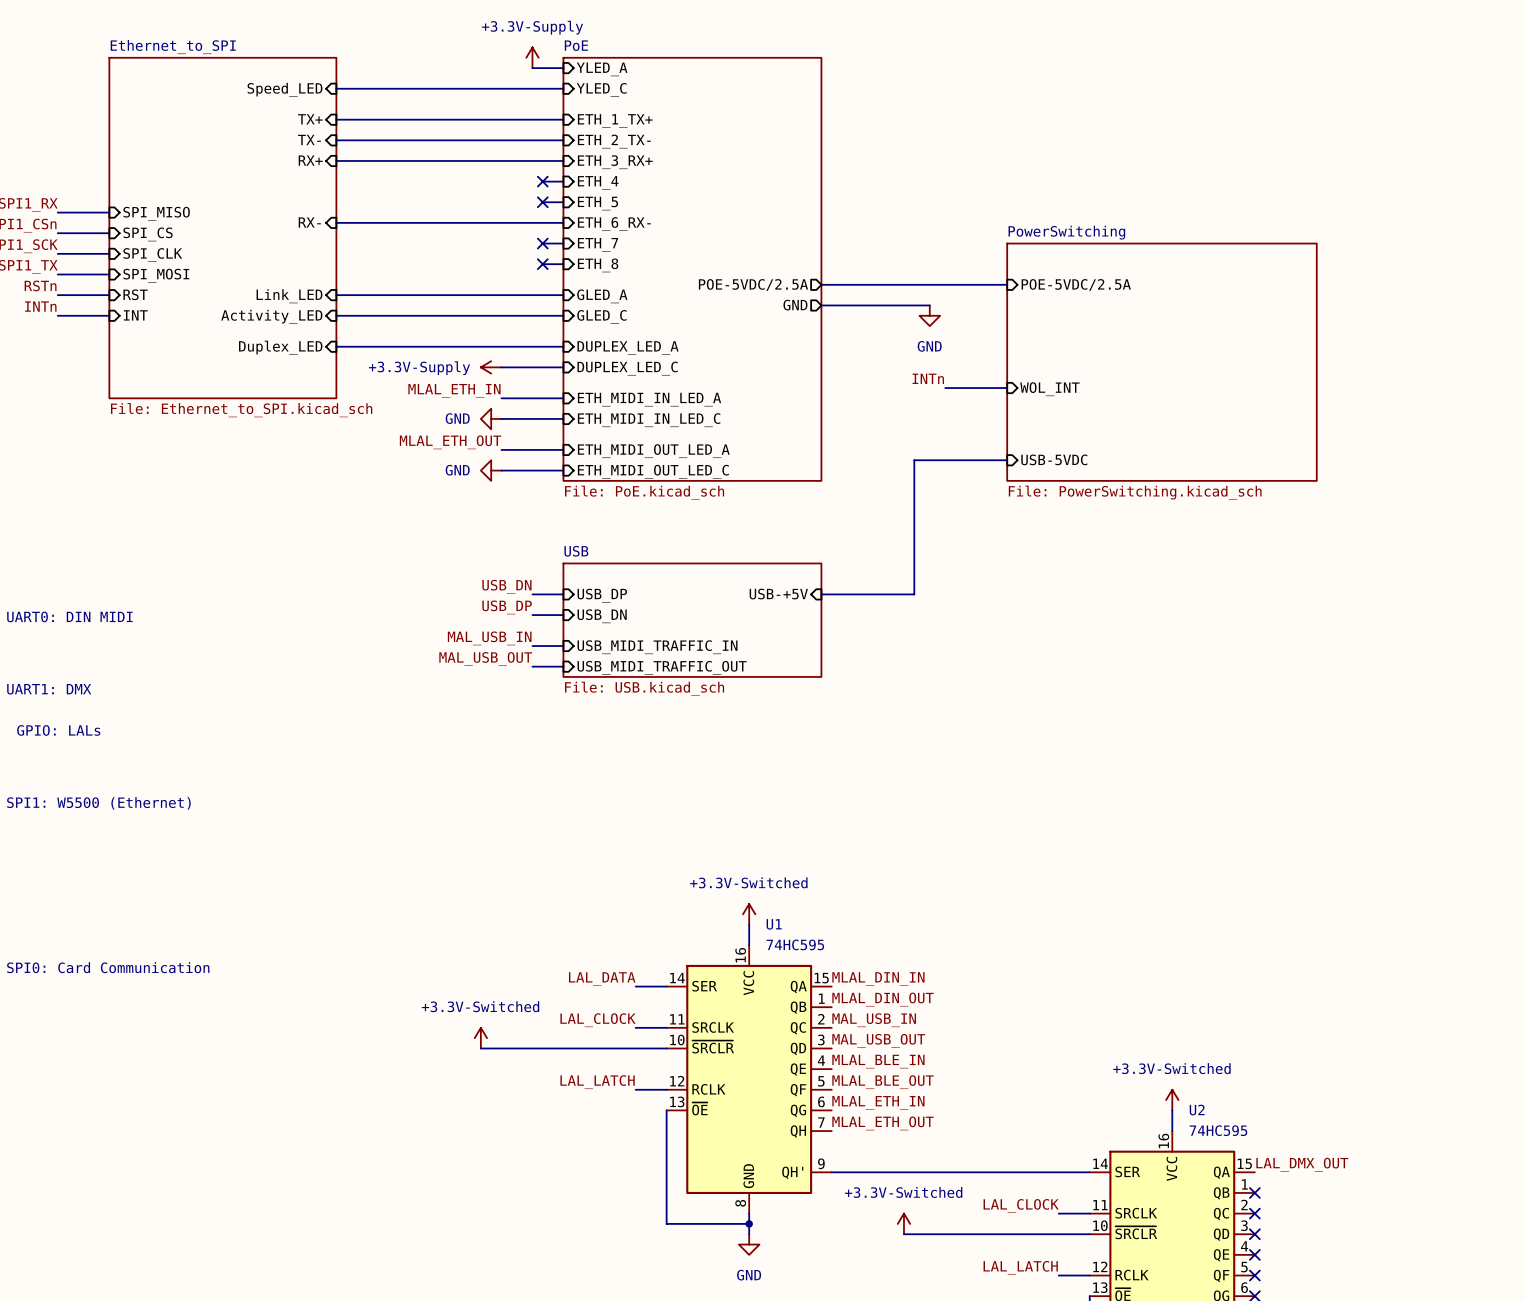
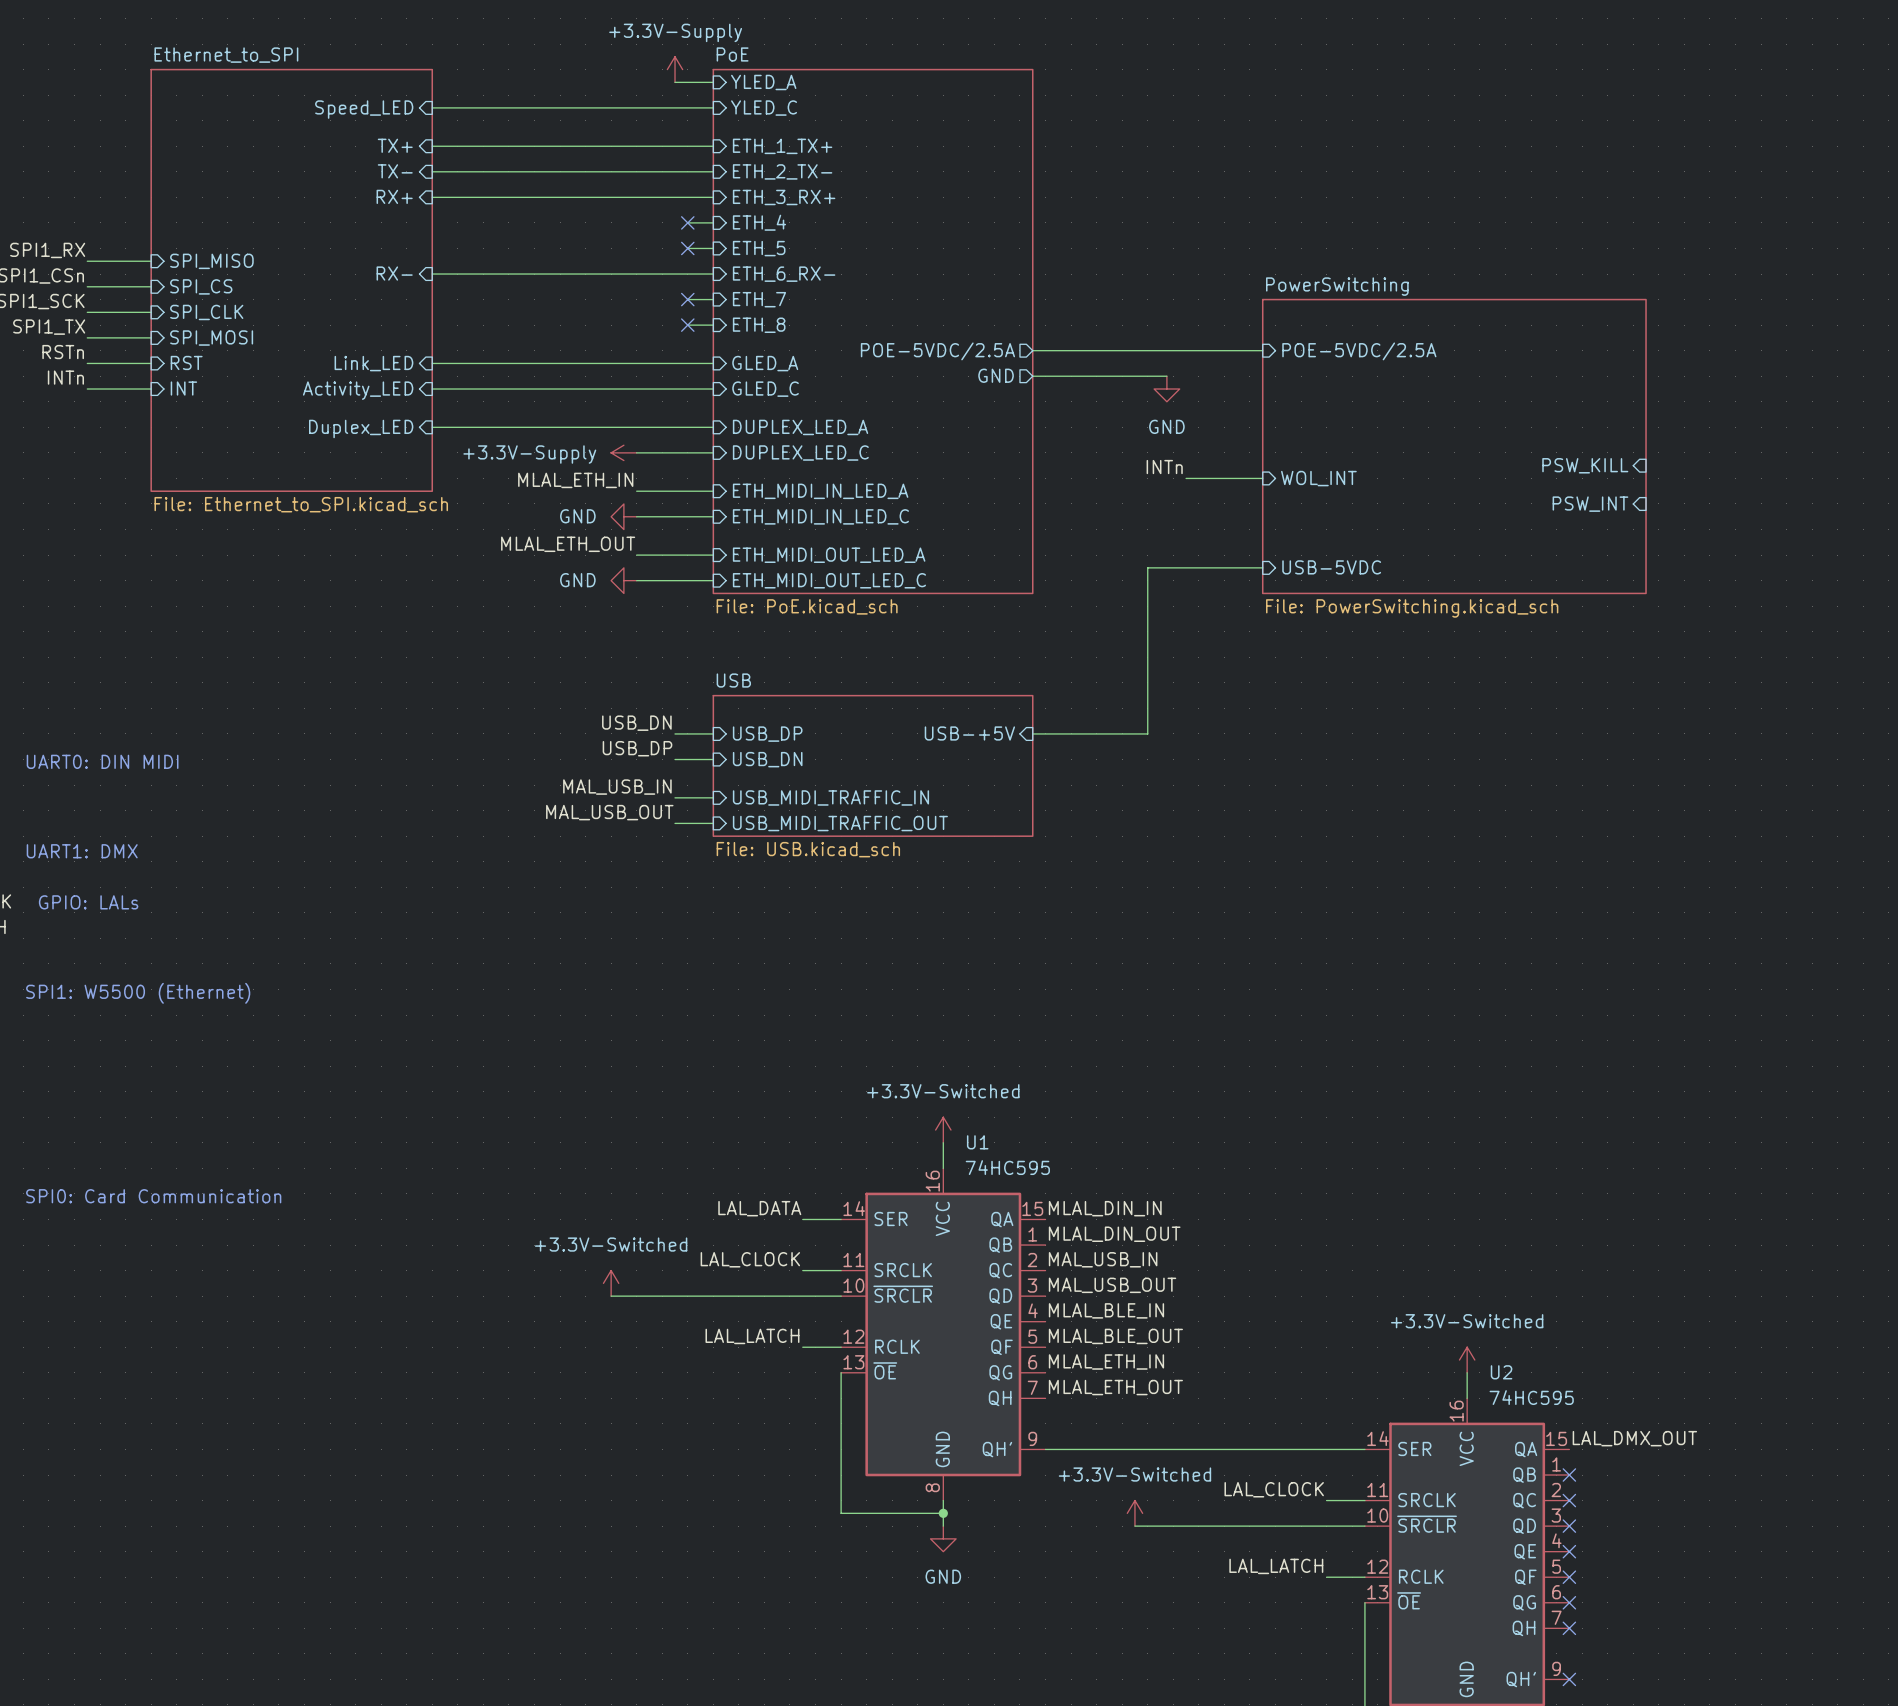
sheet pin: none -> PSW_KILL (1585, 465)
sheet pin: none -> PSW_INT (1590, 504)

